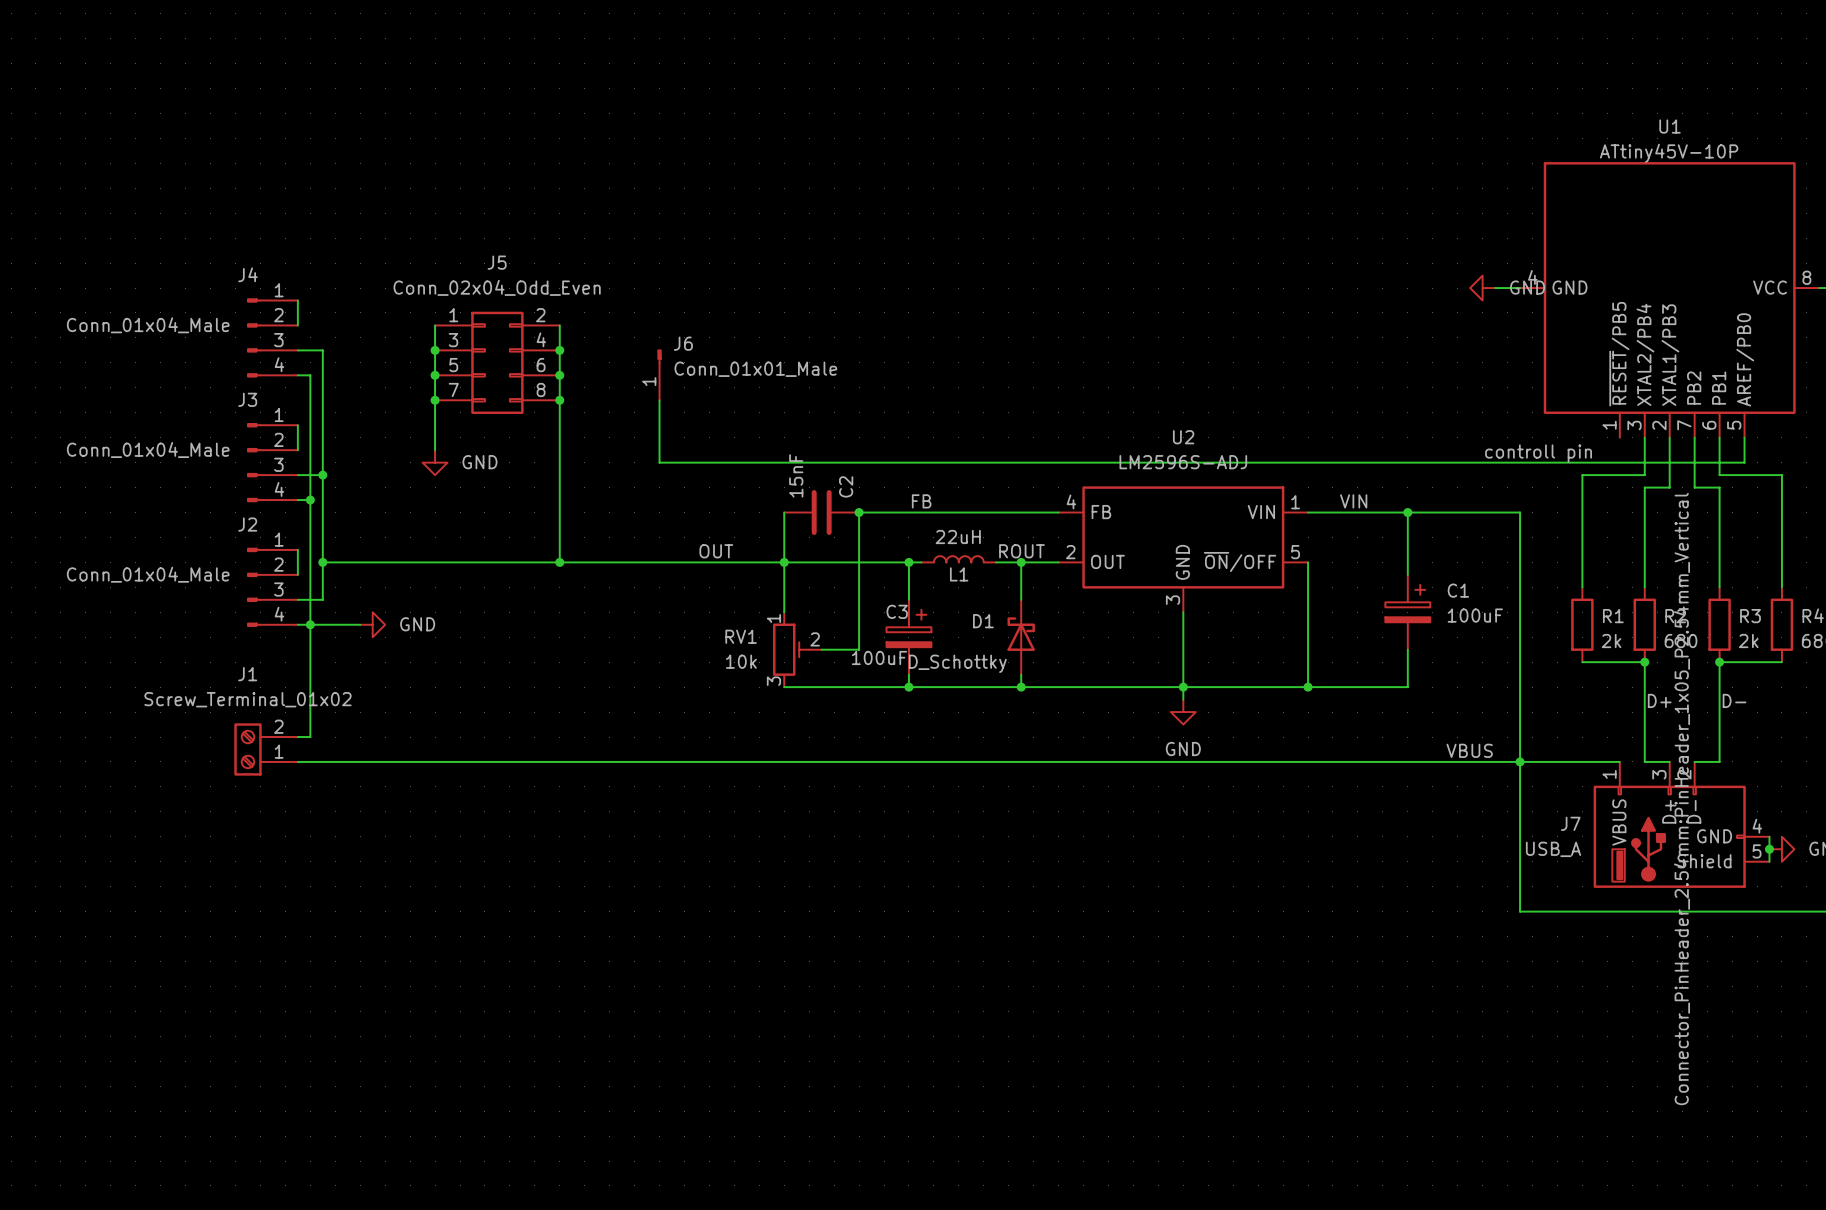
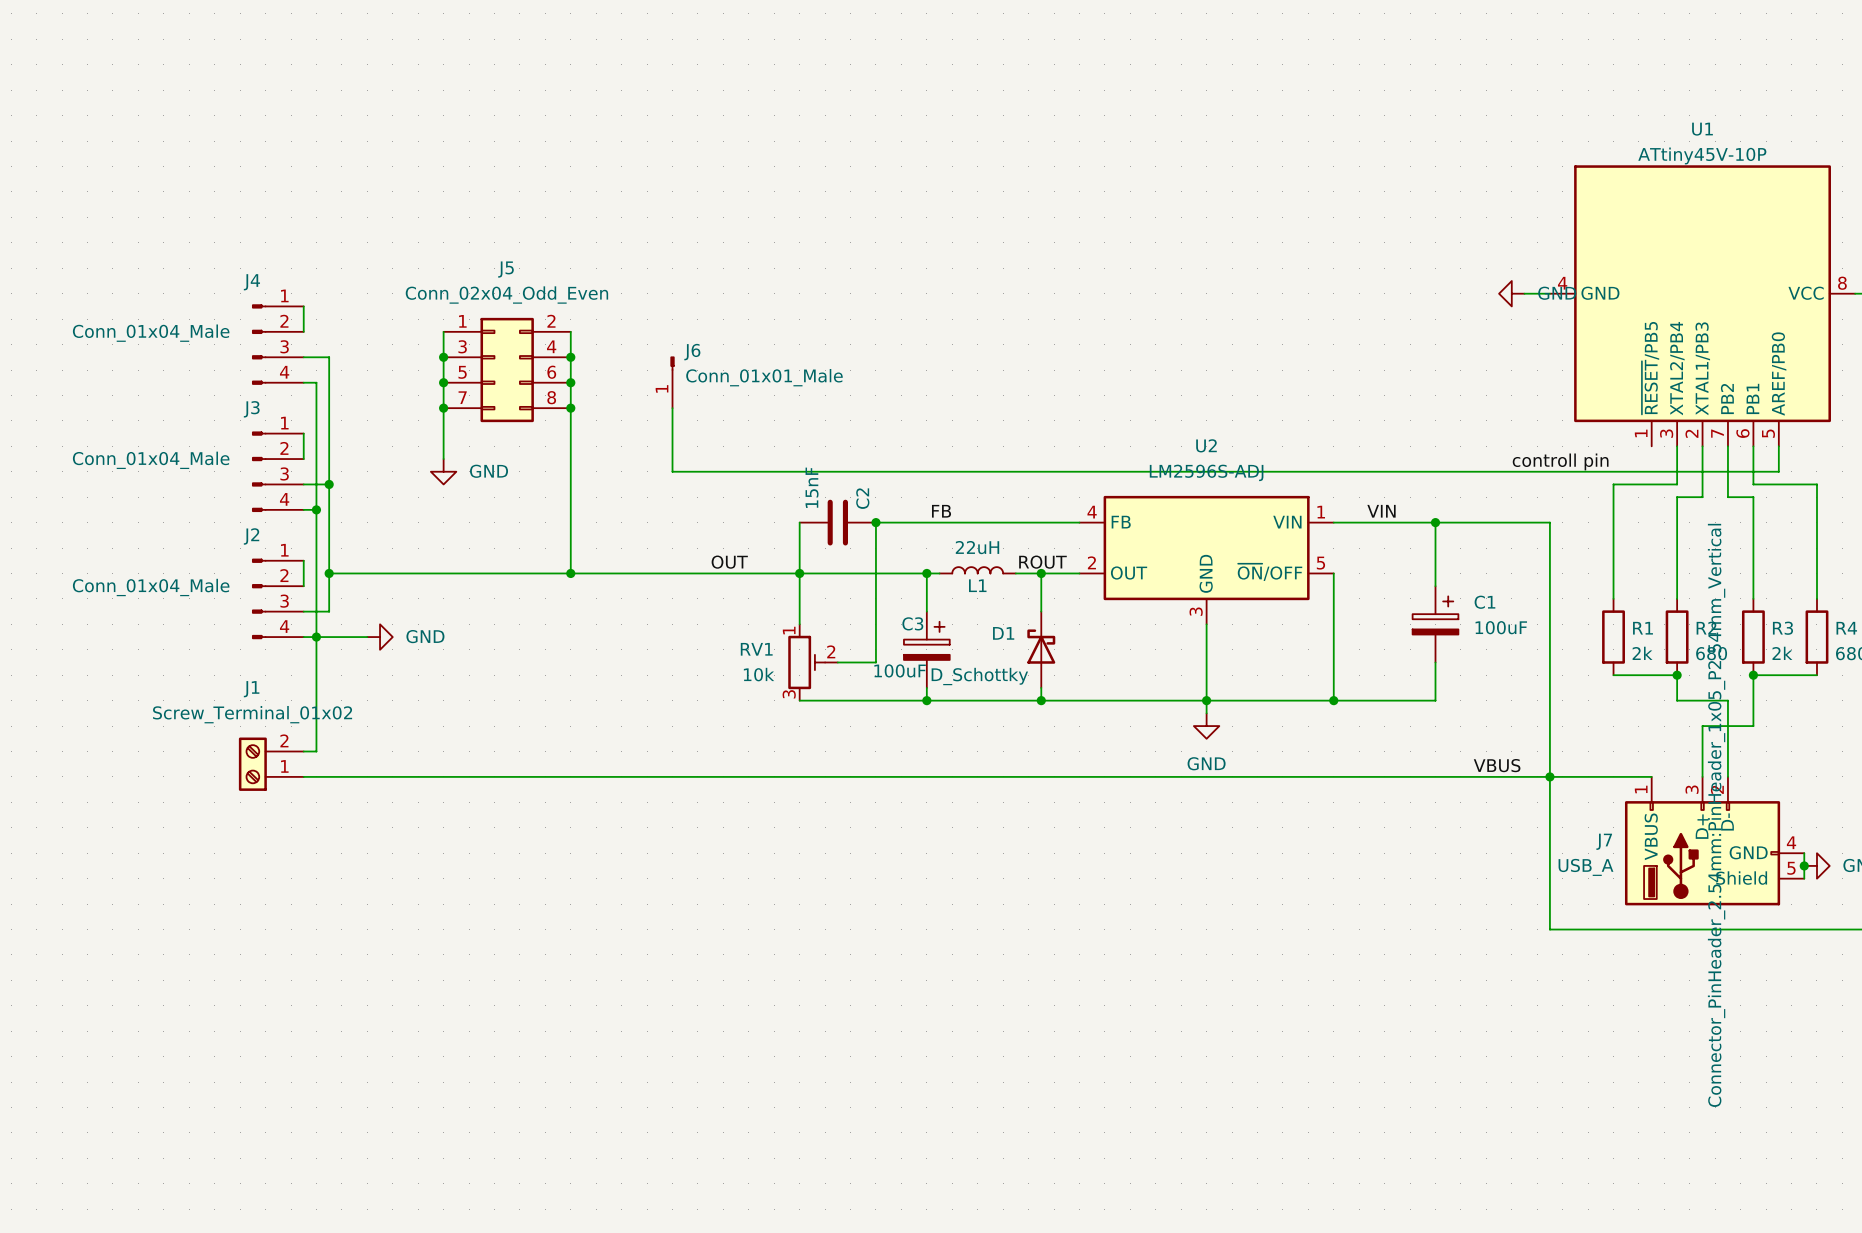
wire: (1644, 687) (1644, 761) (1669, 761) -> (1677, 700) (1727, 700) (1727, 776)
label: D+ (1659, 700) -> none
label: D- (1734, 700) -> none
wire: (1719, 712) (1719, 761) (1694, 761) -> (1753, 726) (1702, 726) (1702, 776)

